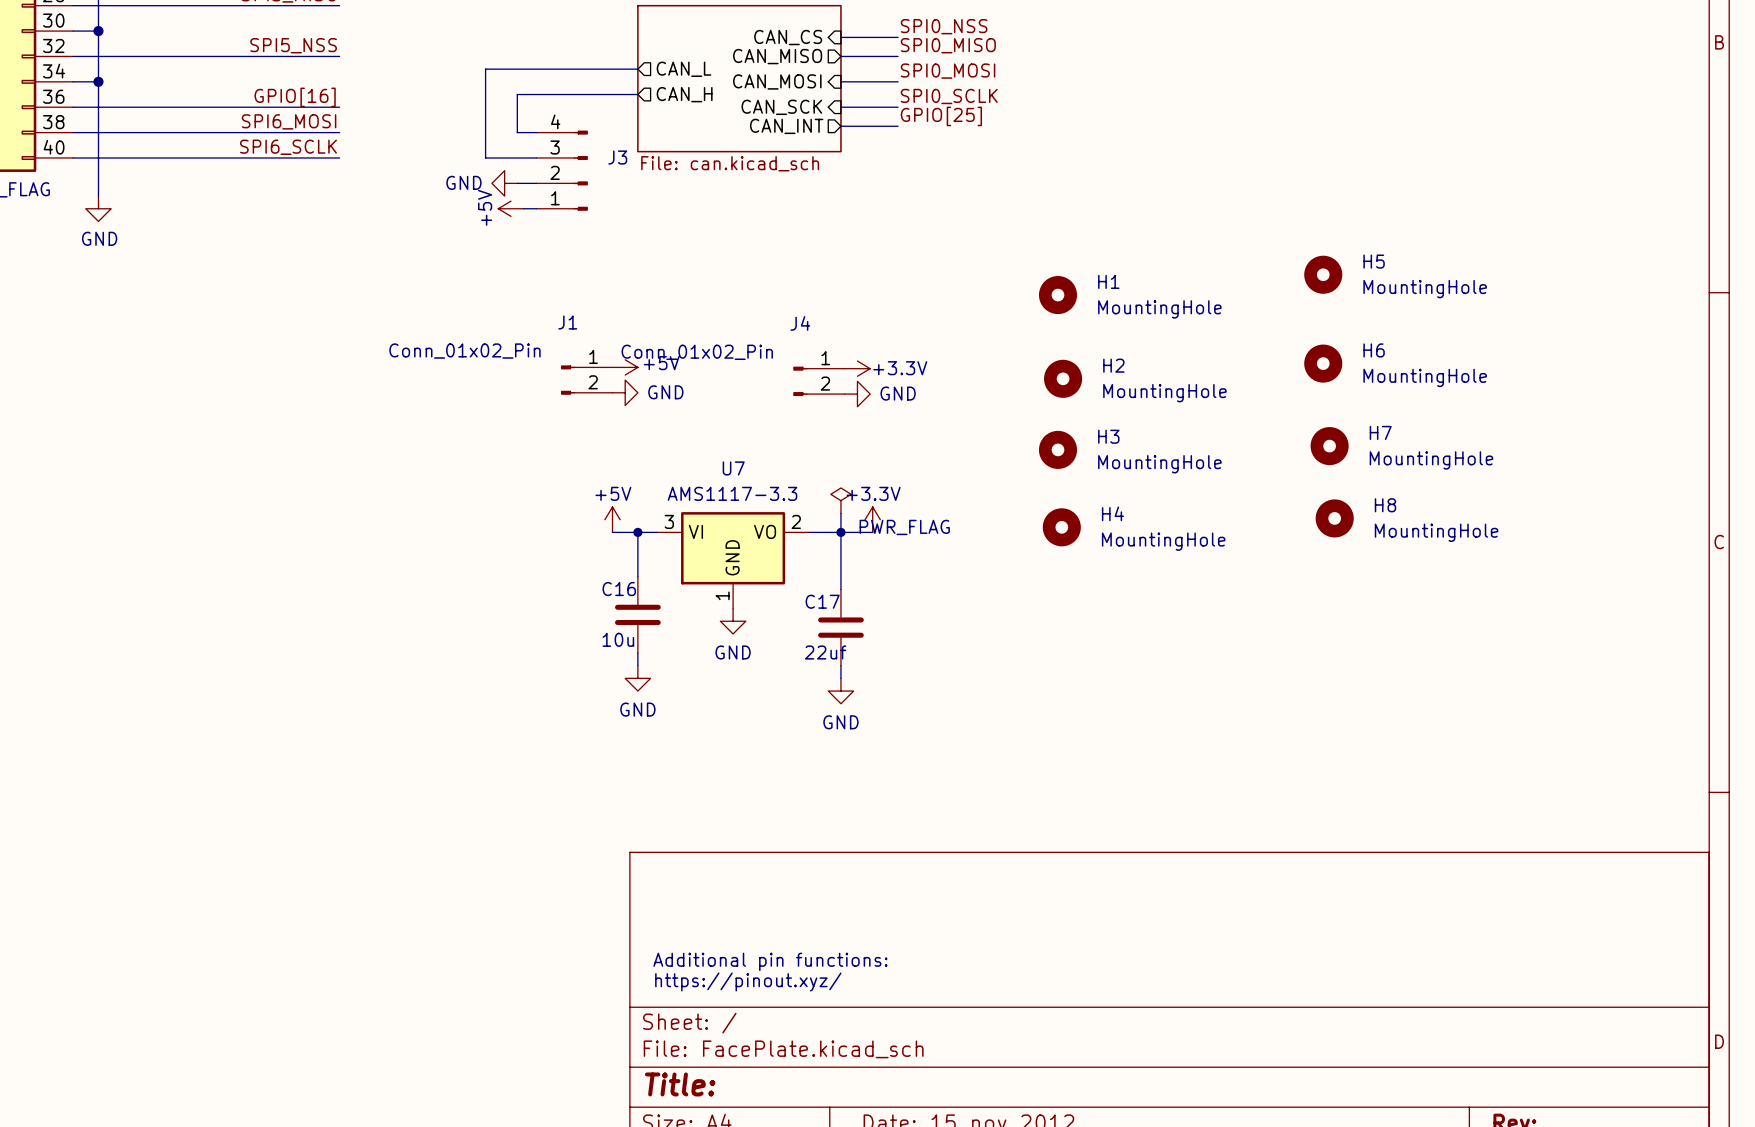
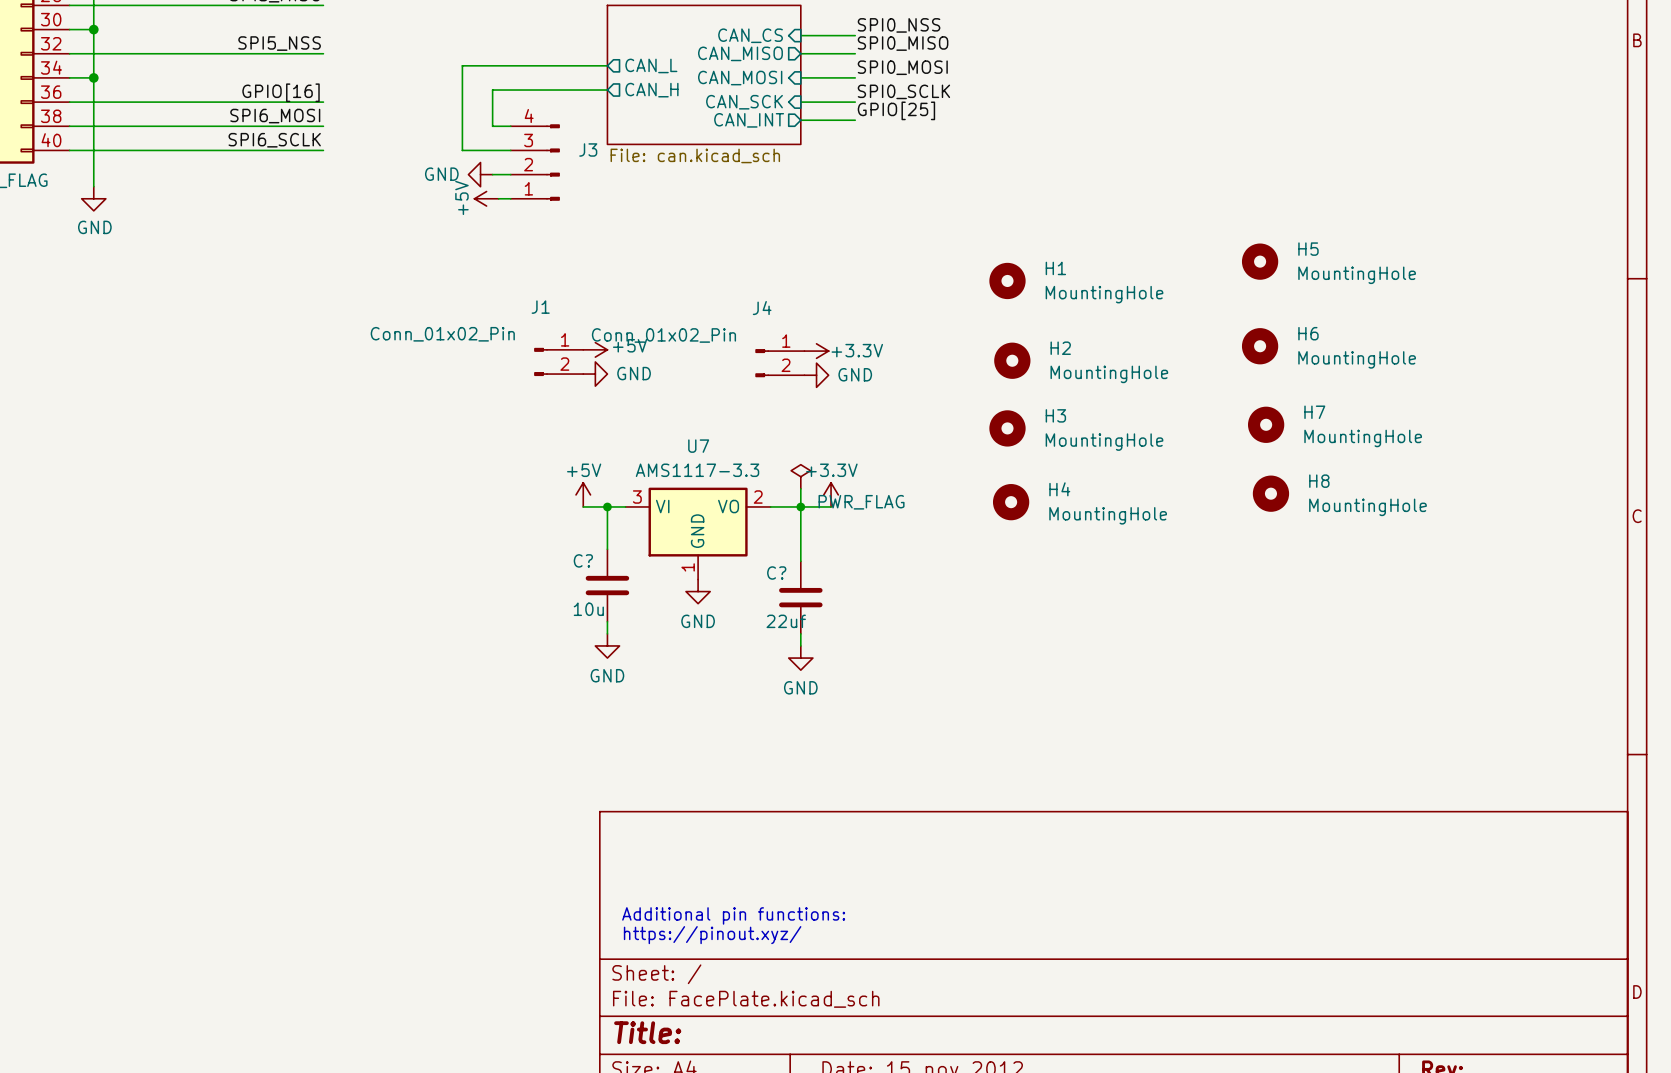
C16 name: C16 (619, 589) -> C? (583, 560)
C17 name: C17 (822, 601) -> C? (776, 573)

